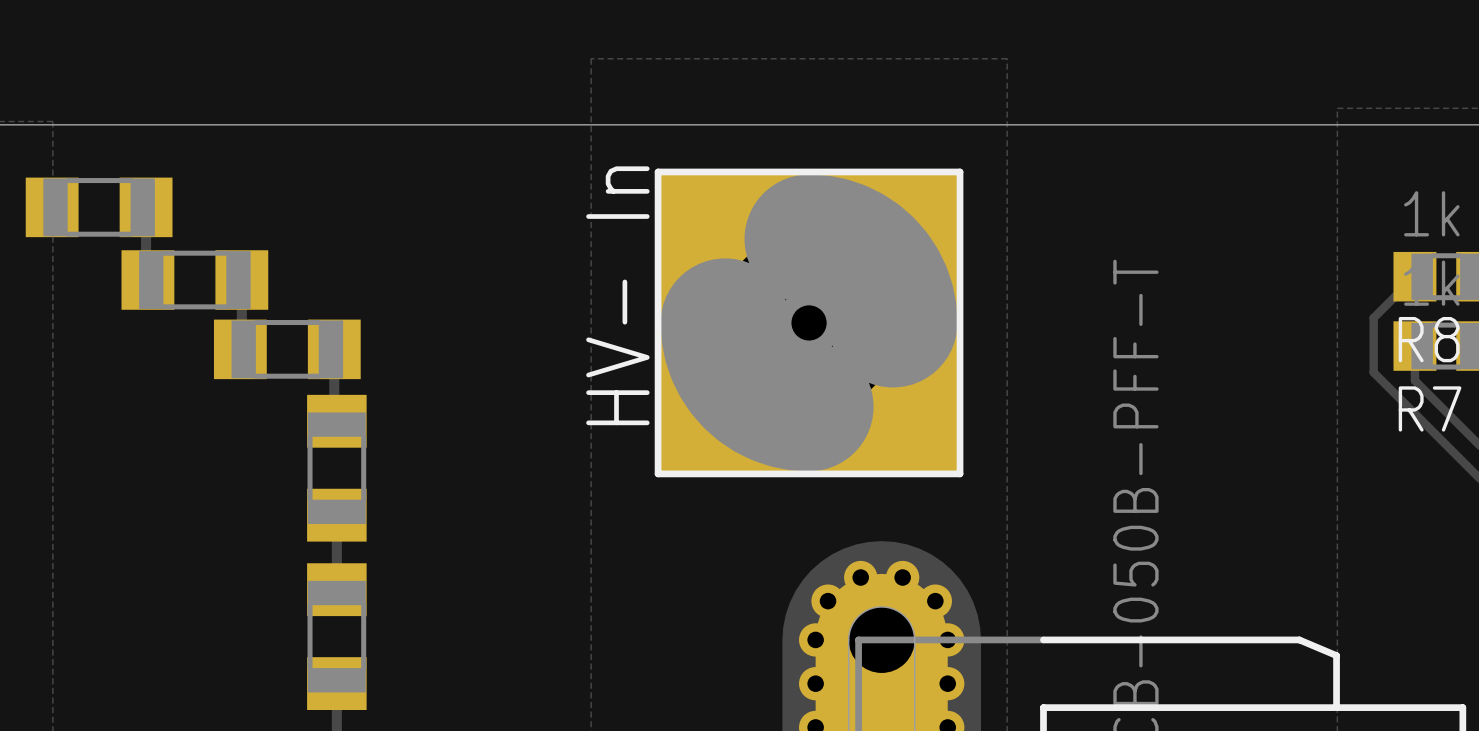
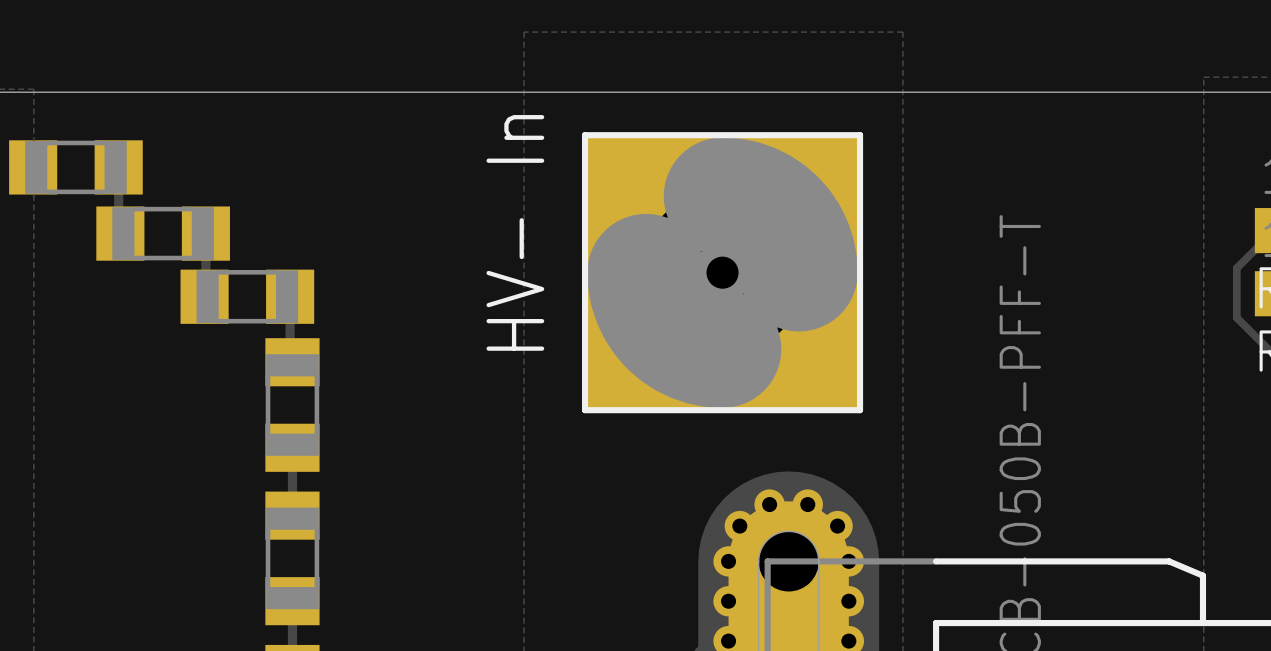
text position: HV- In (617, 295) -> HV- In (515, 232)

